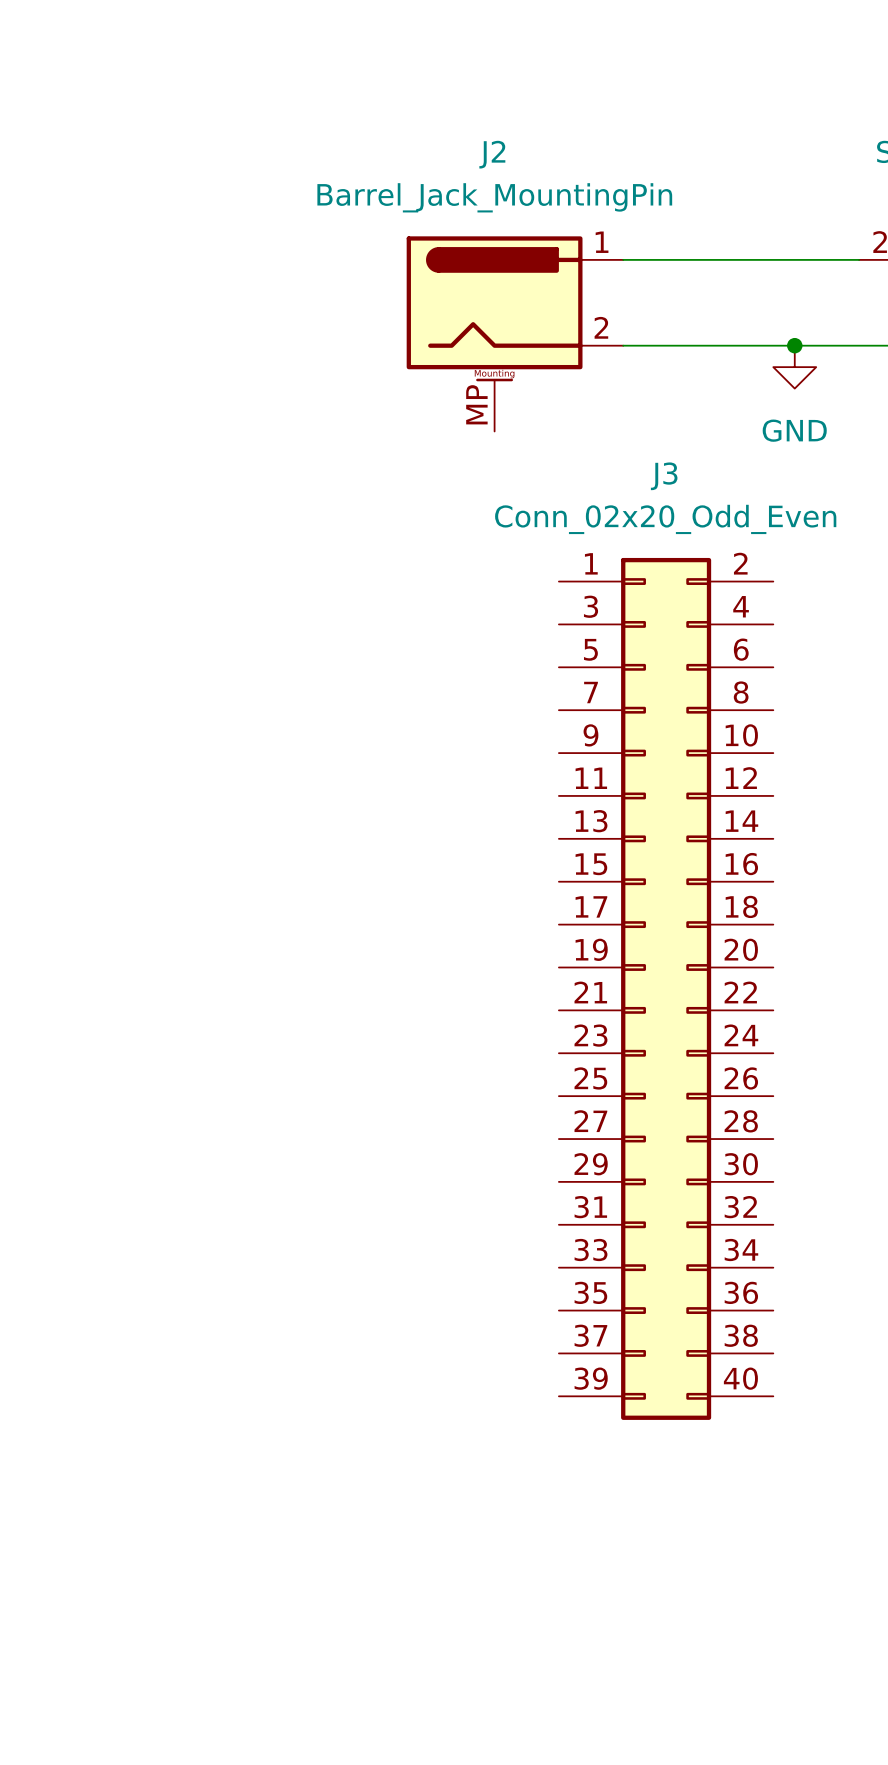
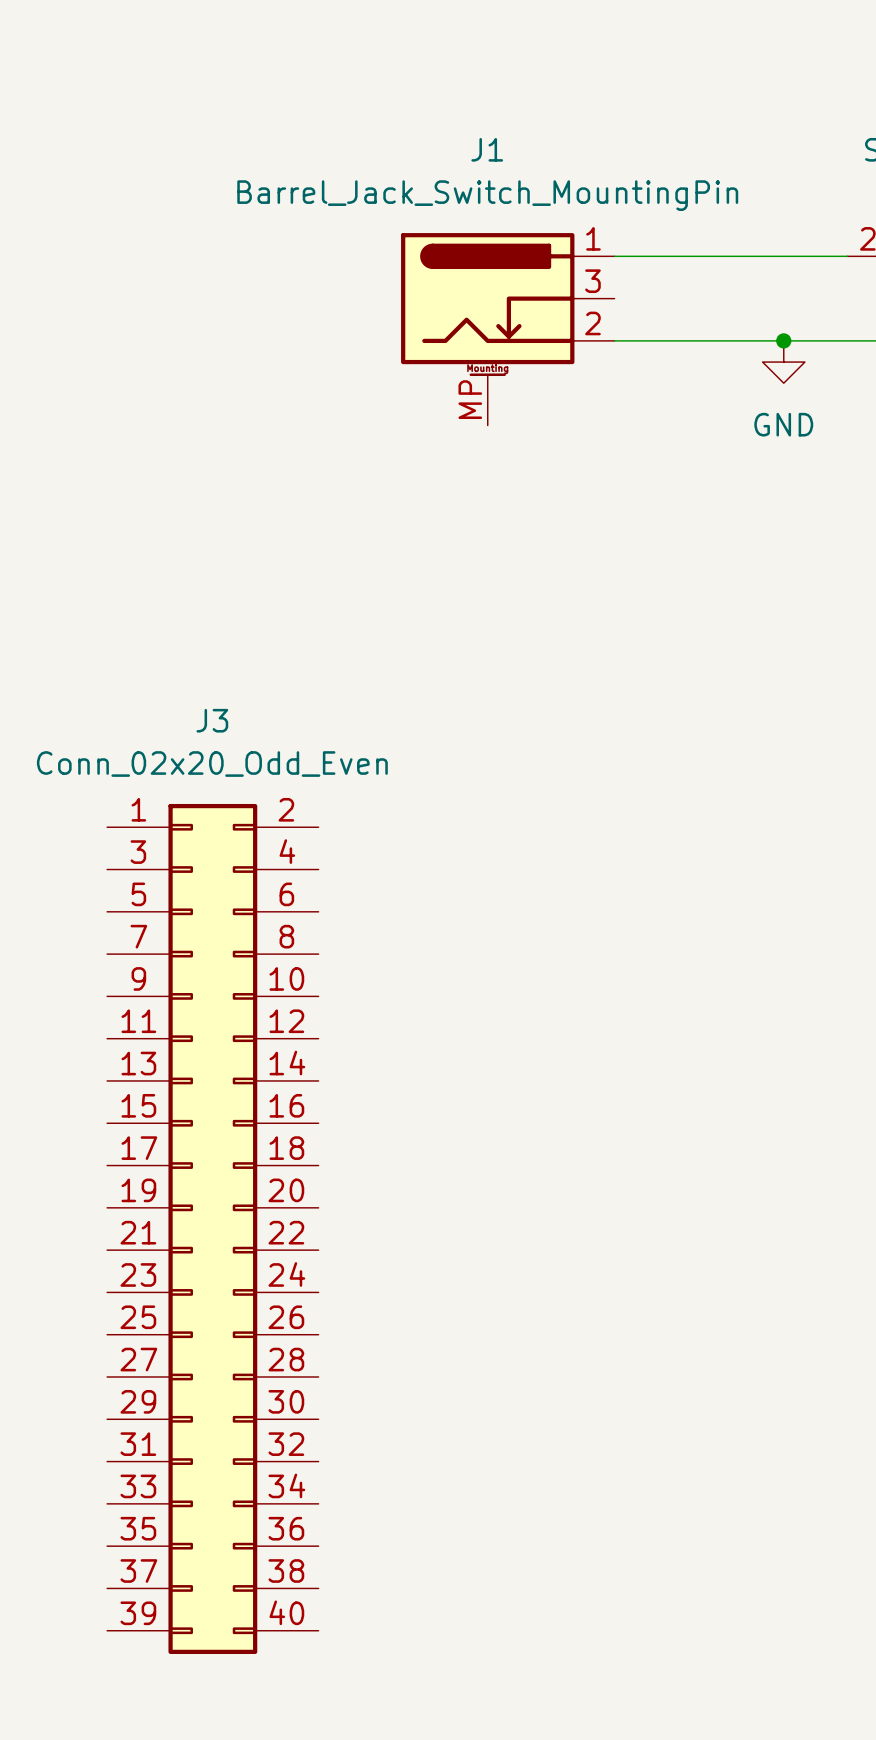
J2: Barrel_Jack_MountingPin (514, 333) -> none
J1: none -> Barrel_Jack_Switch_MountingPin (507, 329)
J3 position: (666, 988) -> (212, 1228)

